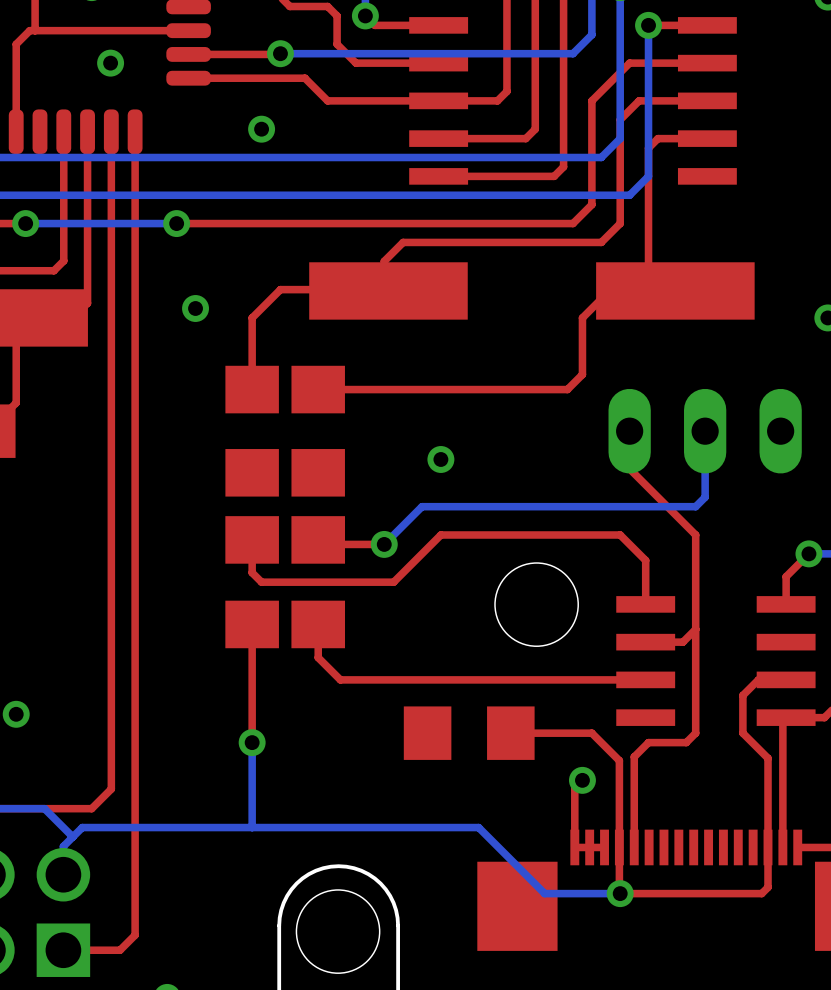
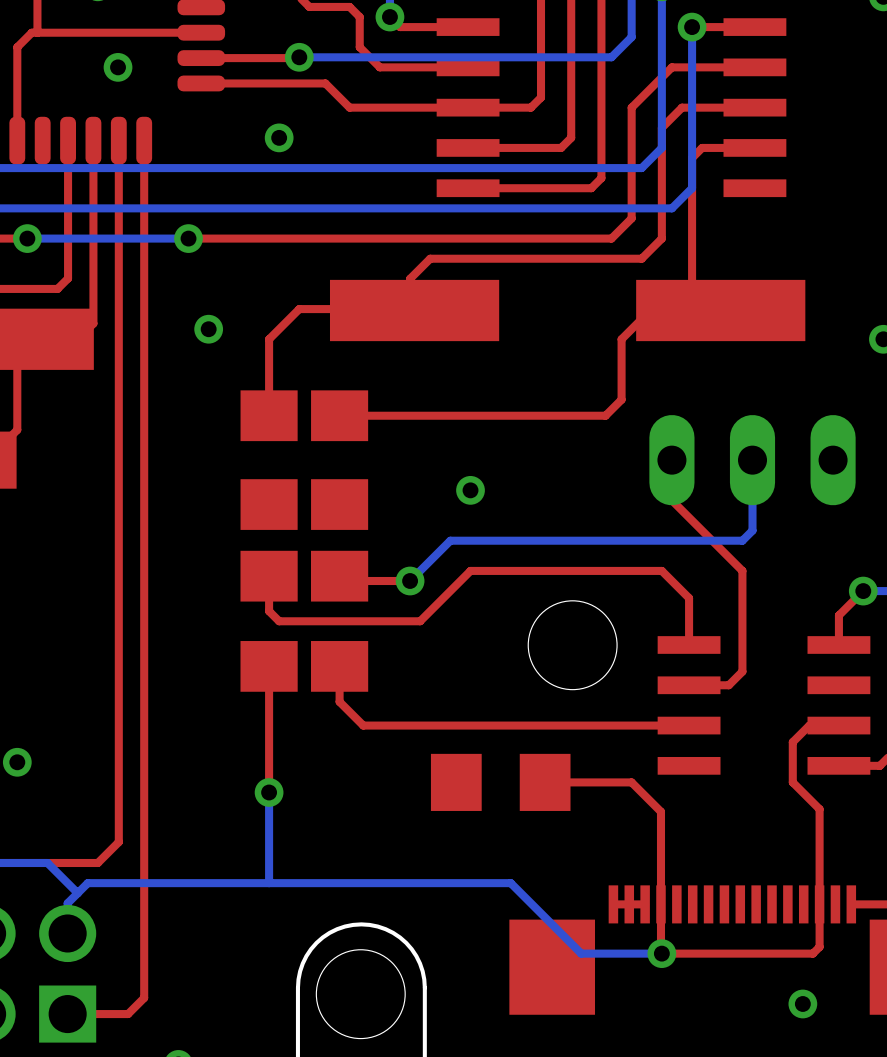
top track: (695, 629) (695, 733) (686, 742) (648, 742) (634, 756) (634, 847) -> none
top track: (786, 717) (782, 720) (782, 847) -> none
top track: (582, 780) (574, 788) (574, 847) -> none
via: (582, 780) -> none
via: none -> (802, 1003)

